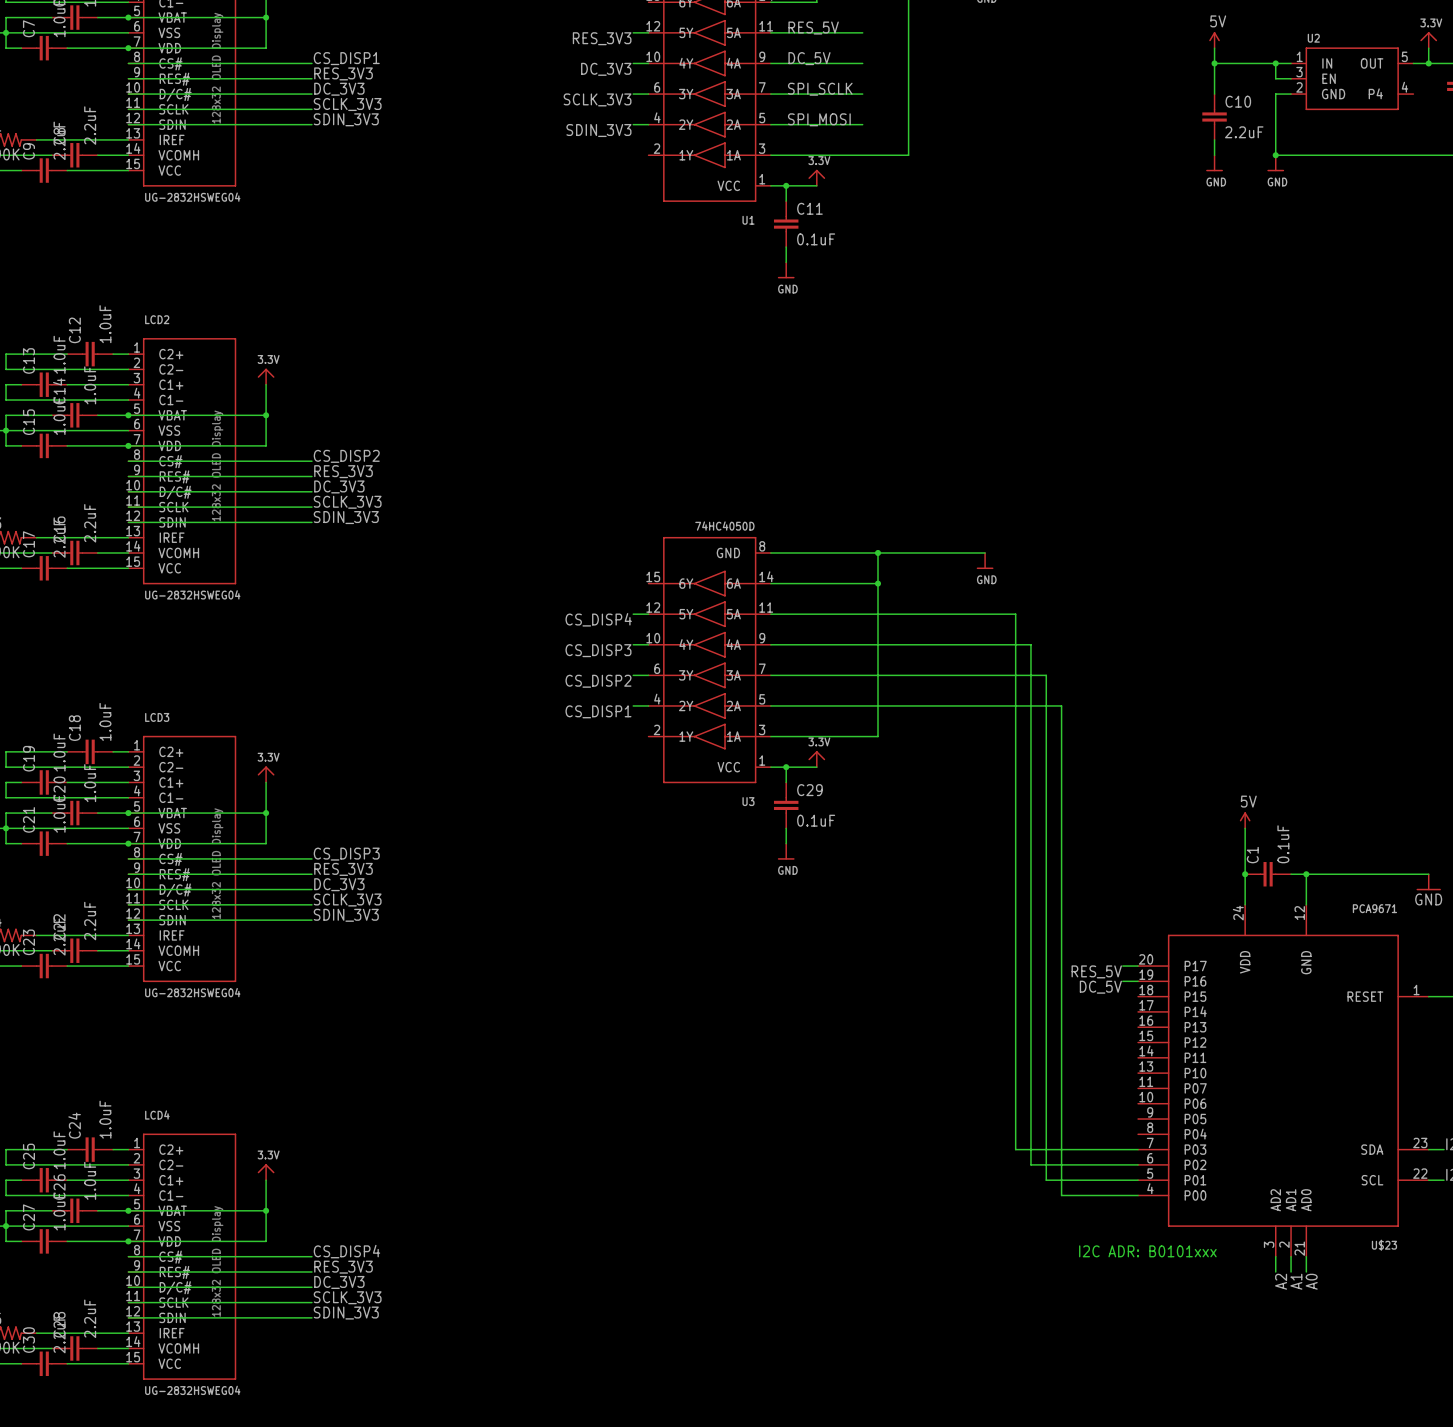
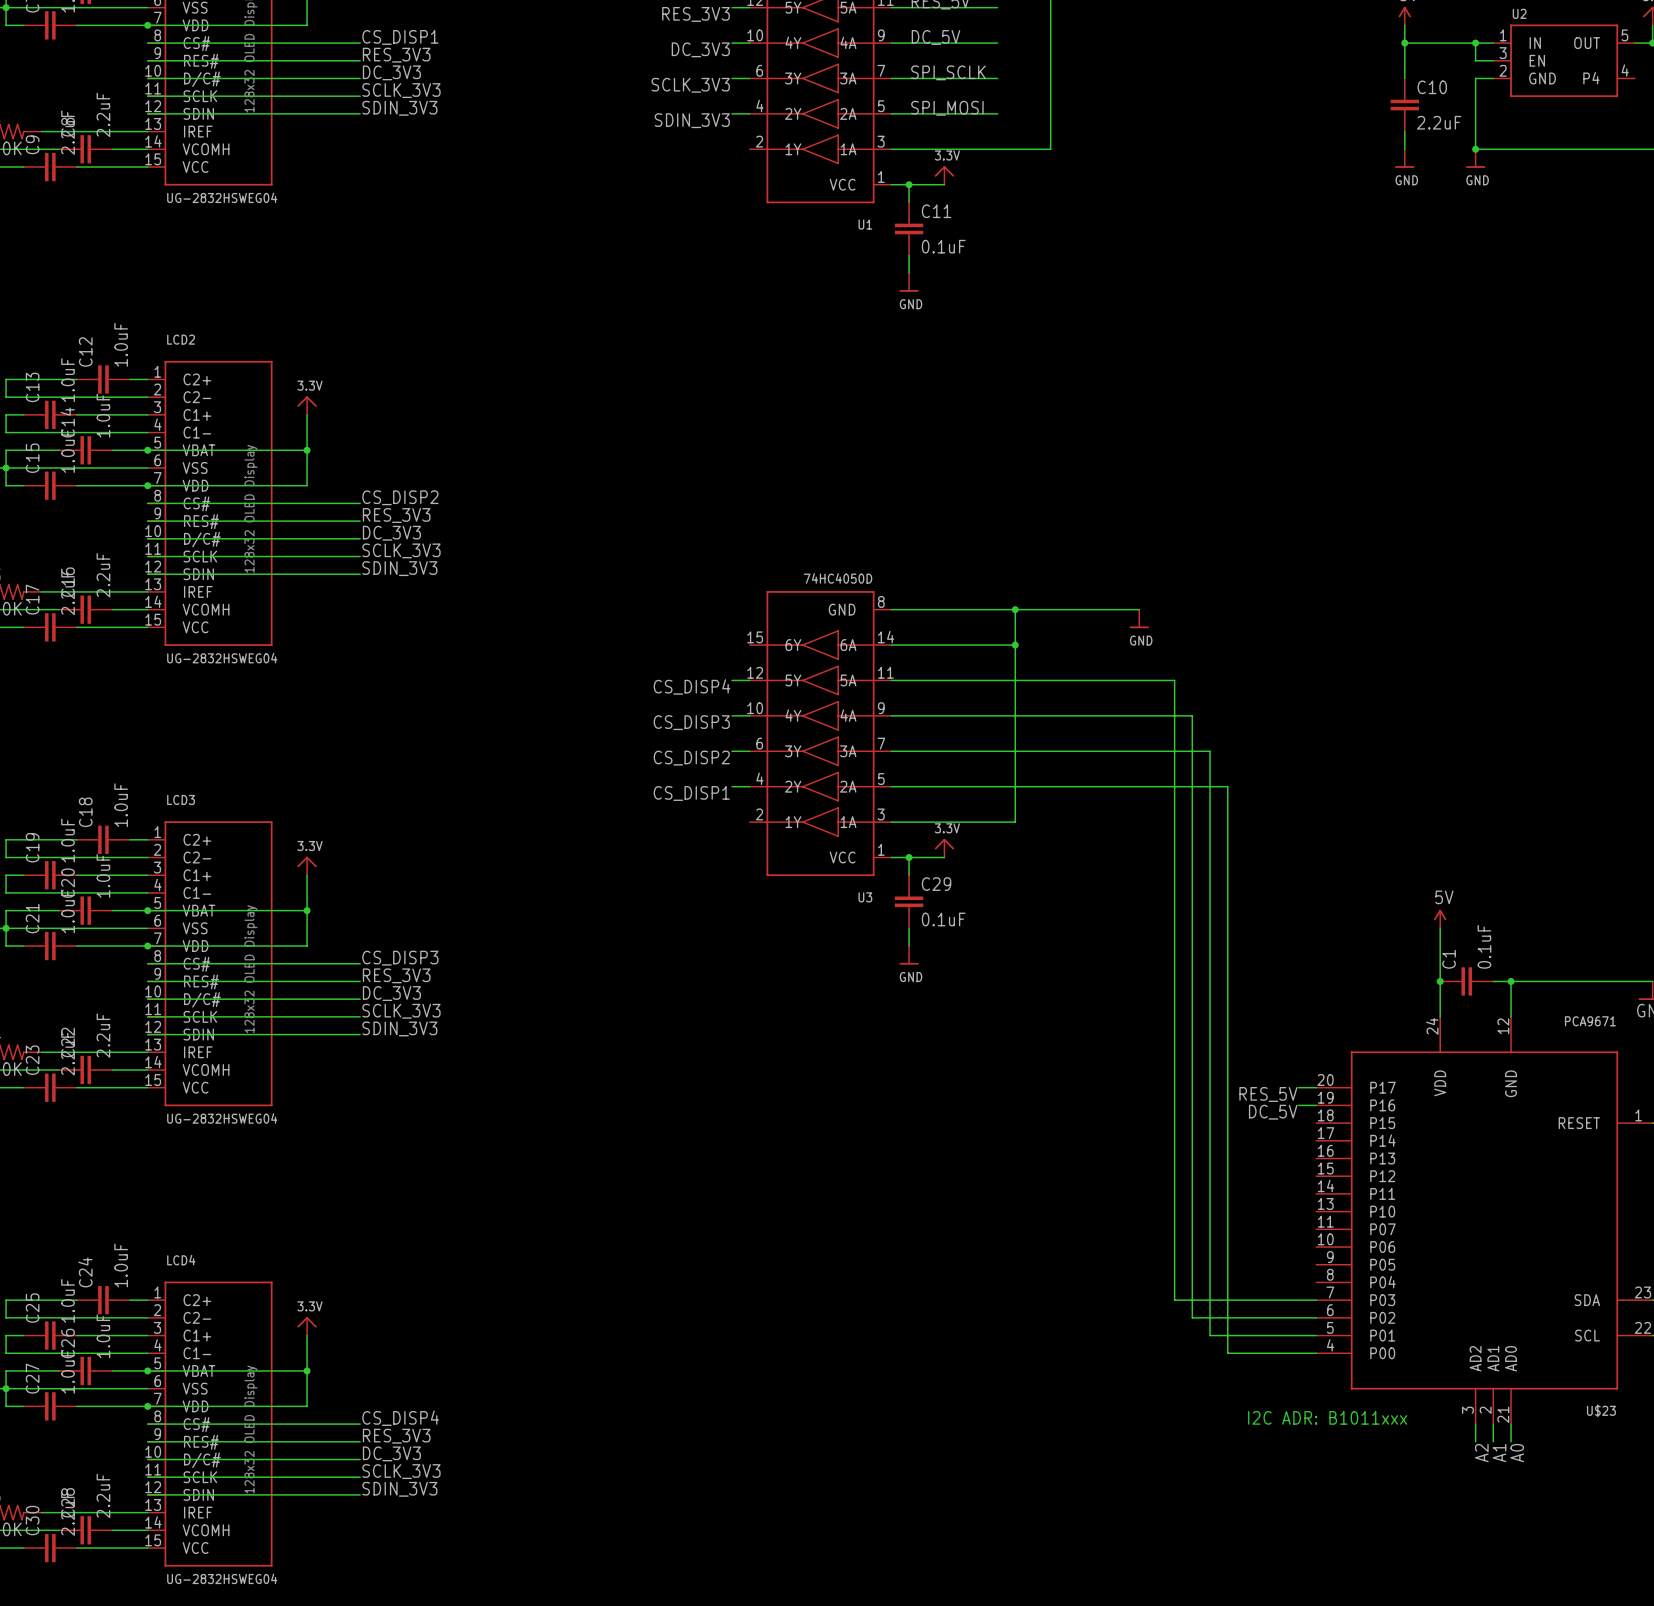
text: I2C ADR: B0101xxx (1147, 1251) -> I2C ADR: B1011xxx (1327, 1417)

